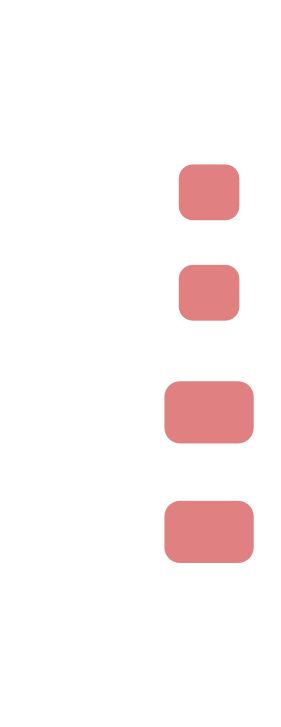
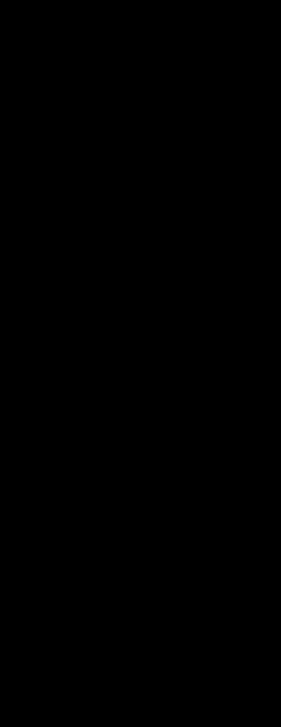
part: (209, 242) -> none
part: (209, 472) -> none

